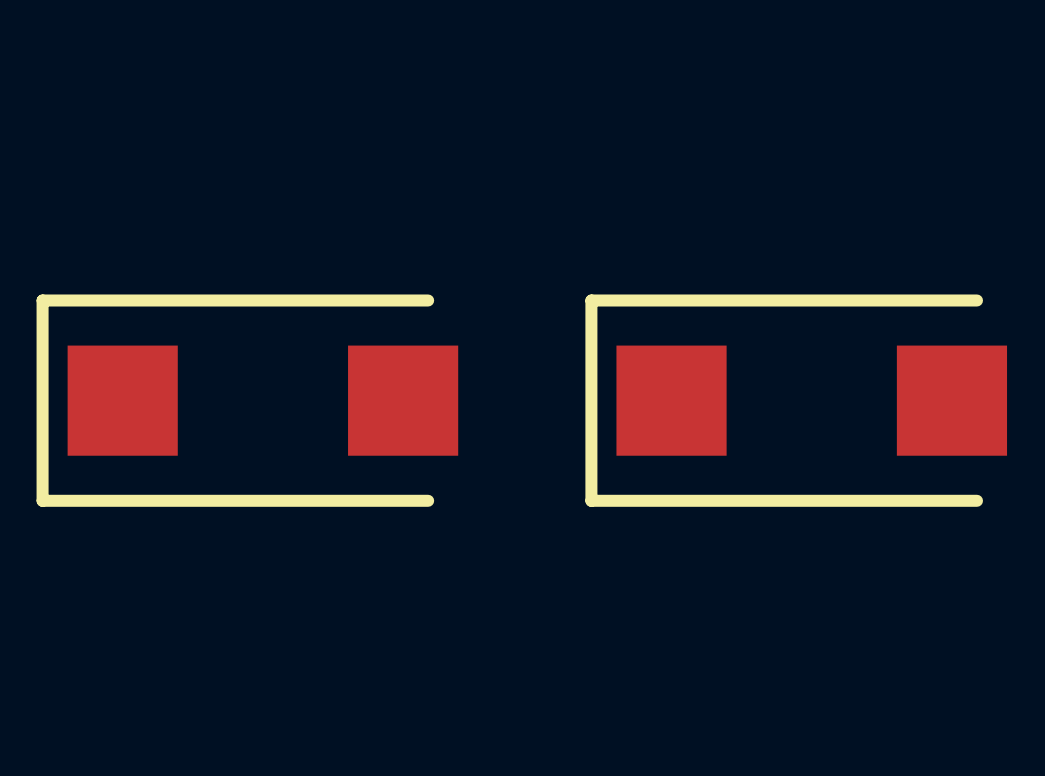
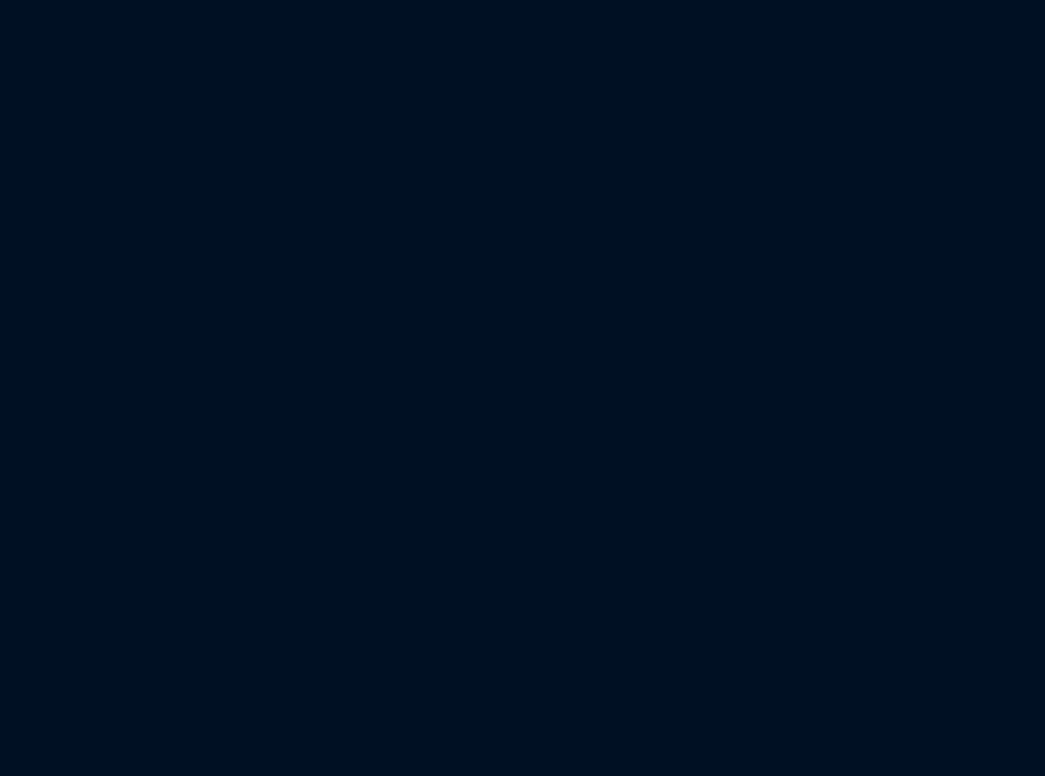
part: (247, 400) -> none
part: (796, 400) -> none

